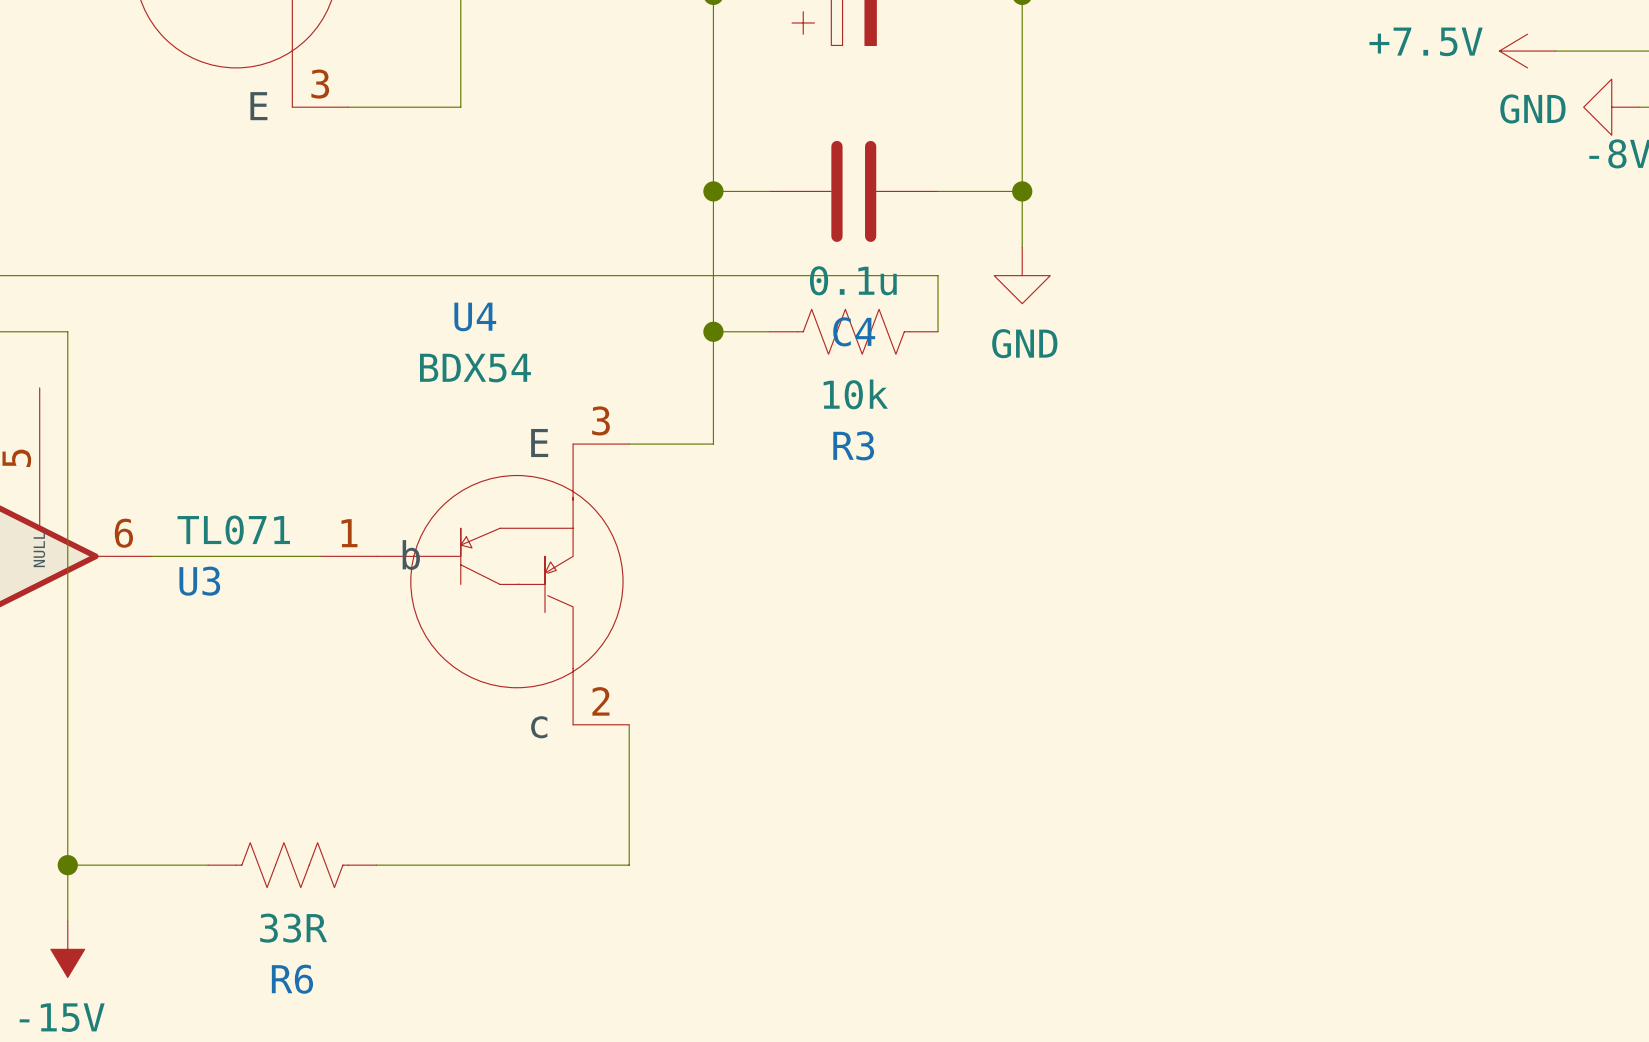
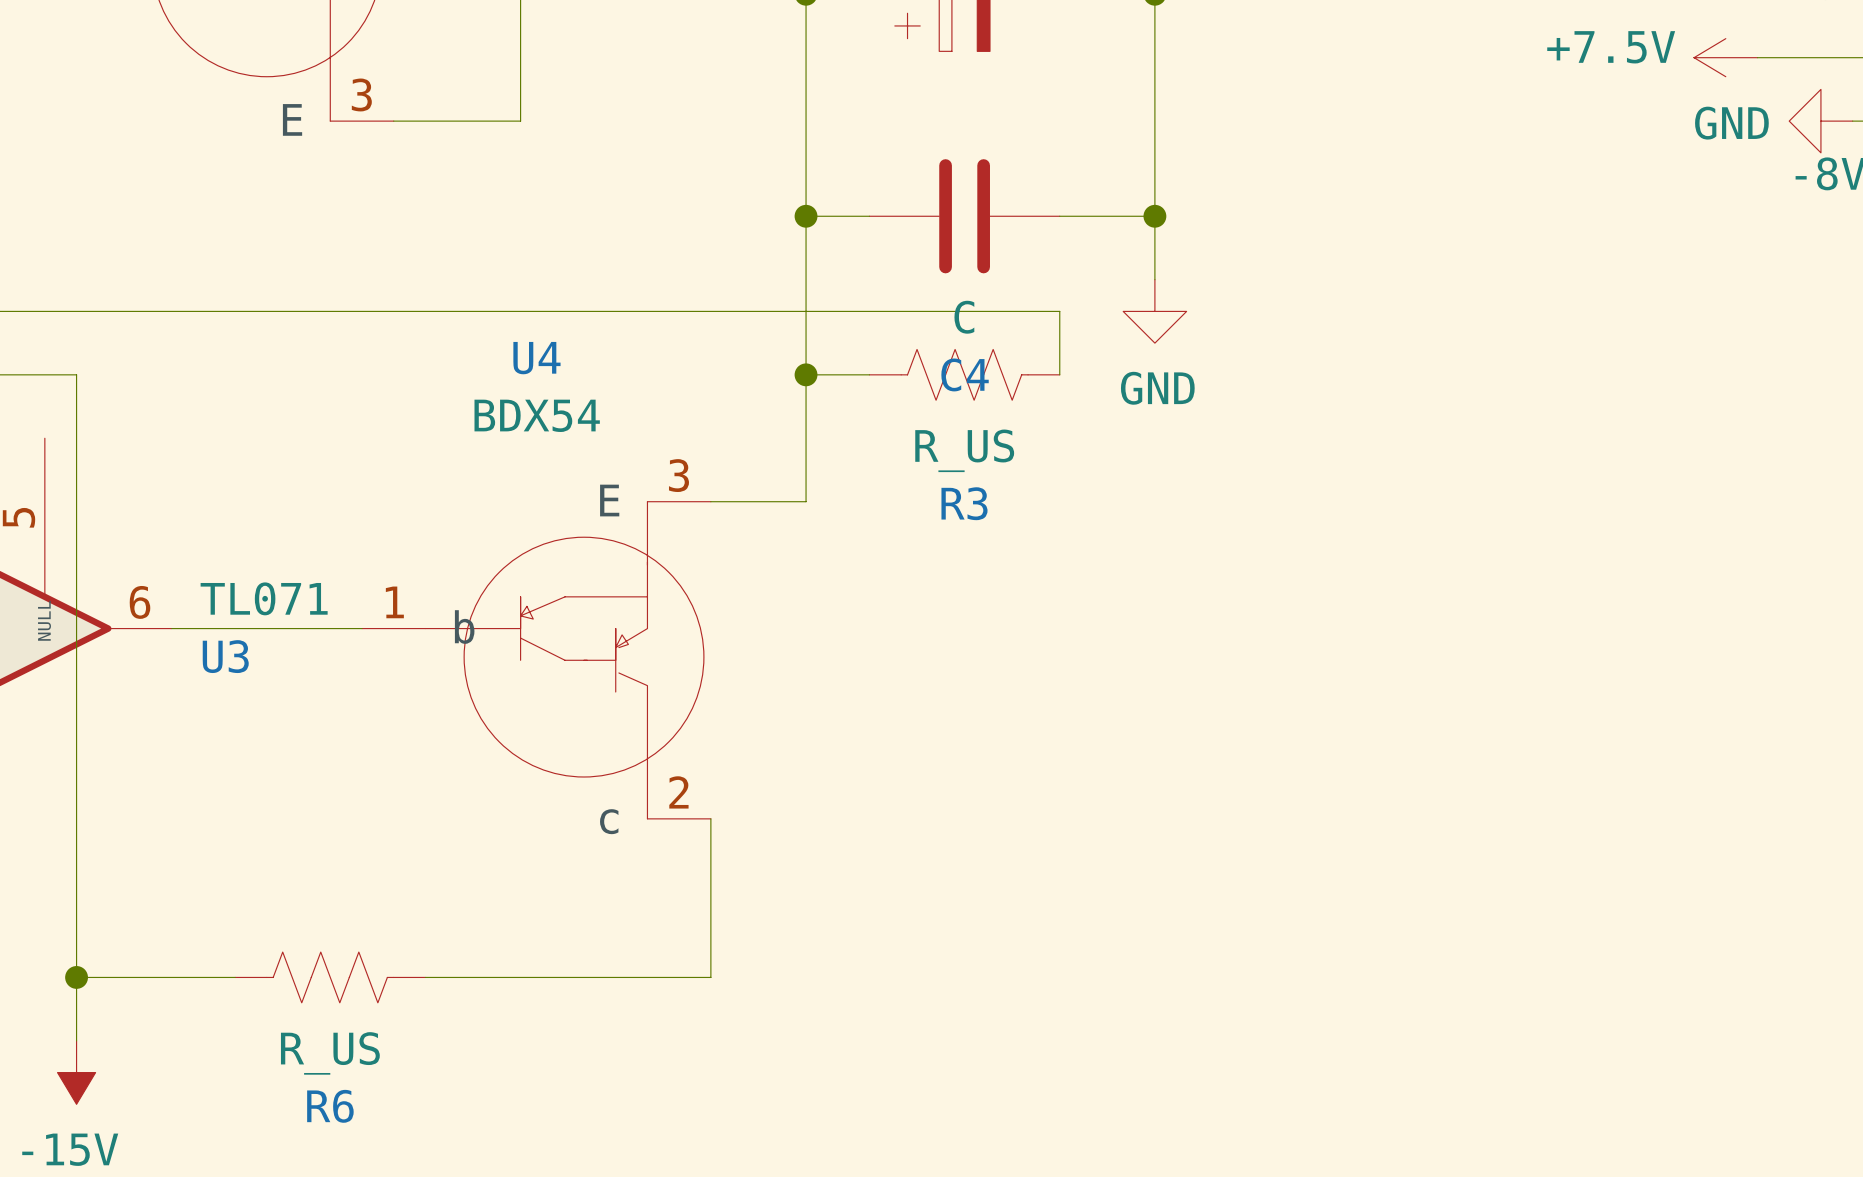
C4 value: 0.1u (853, 280) -> C (964, 317)
R3 value: 10k (855, 394) -> R_US (964, 450)
R6 value: 33R (293, 928) -> R_US (330, 1053)

